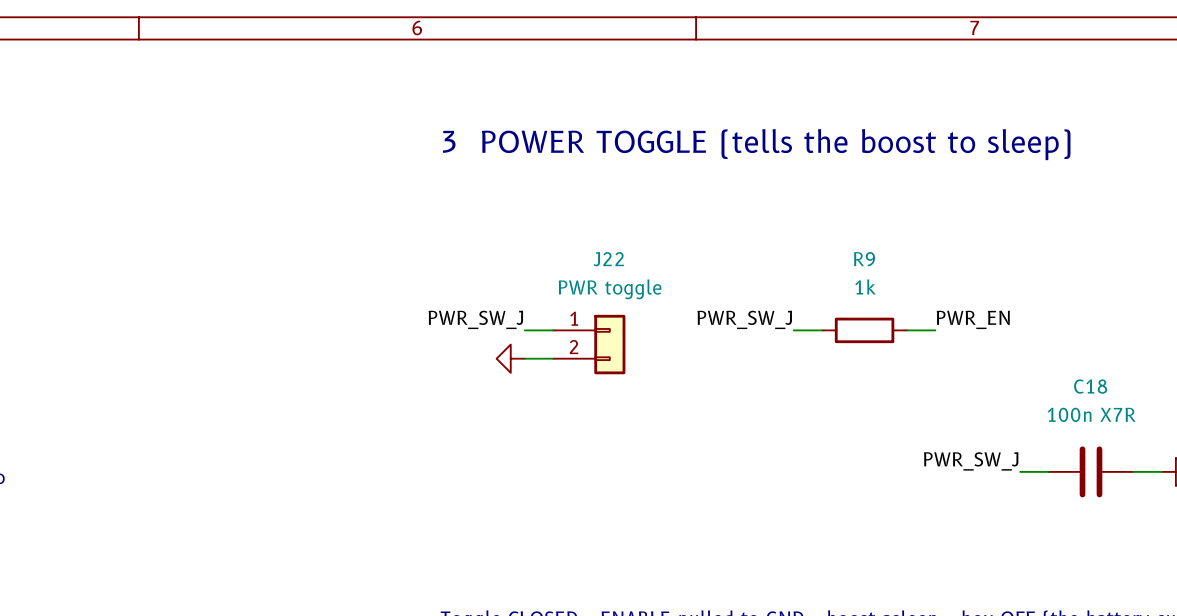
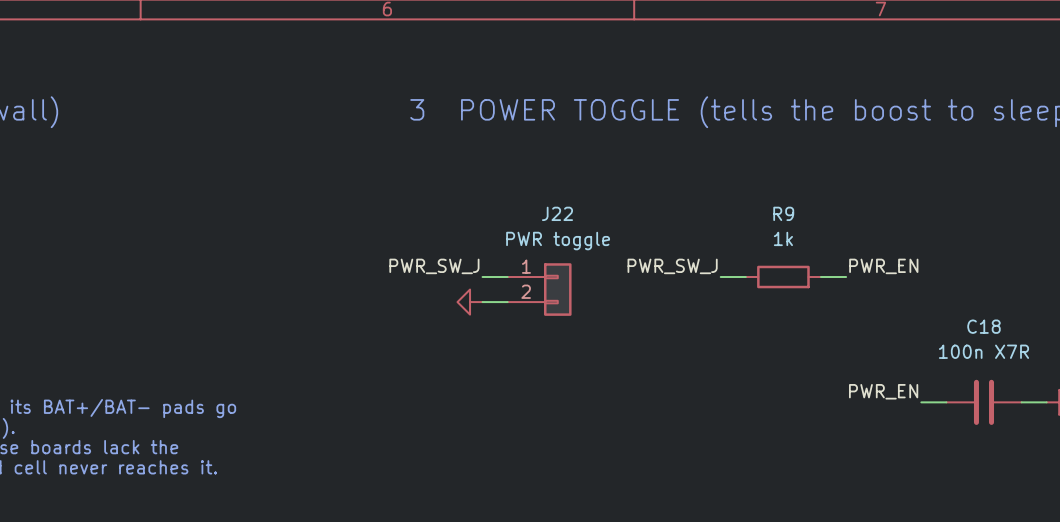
label: PWR_SW_J (971, 461) -> PWR_EN (883, 391)

